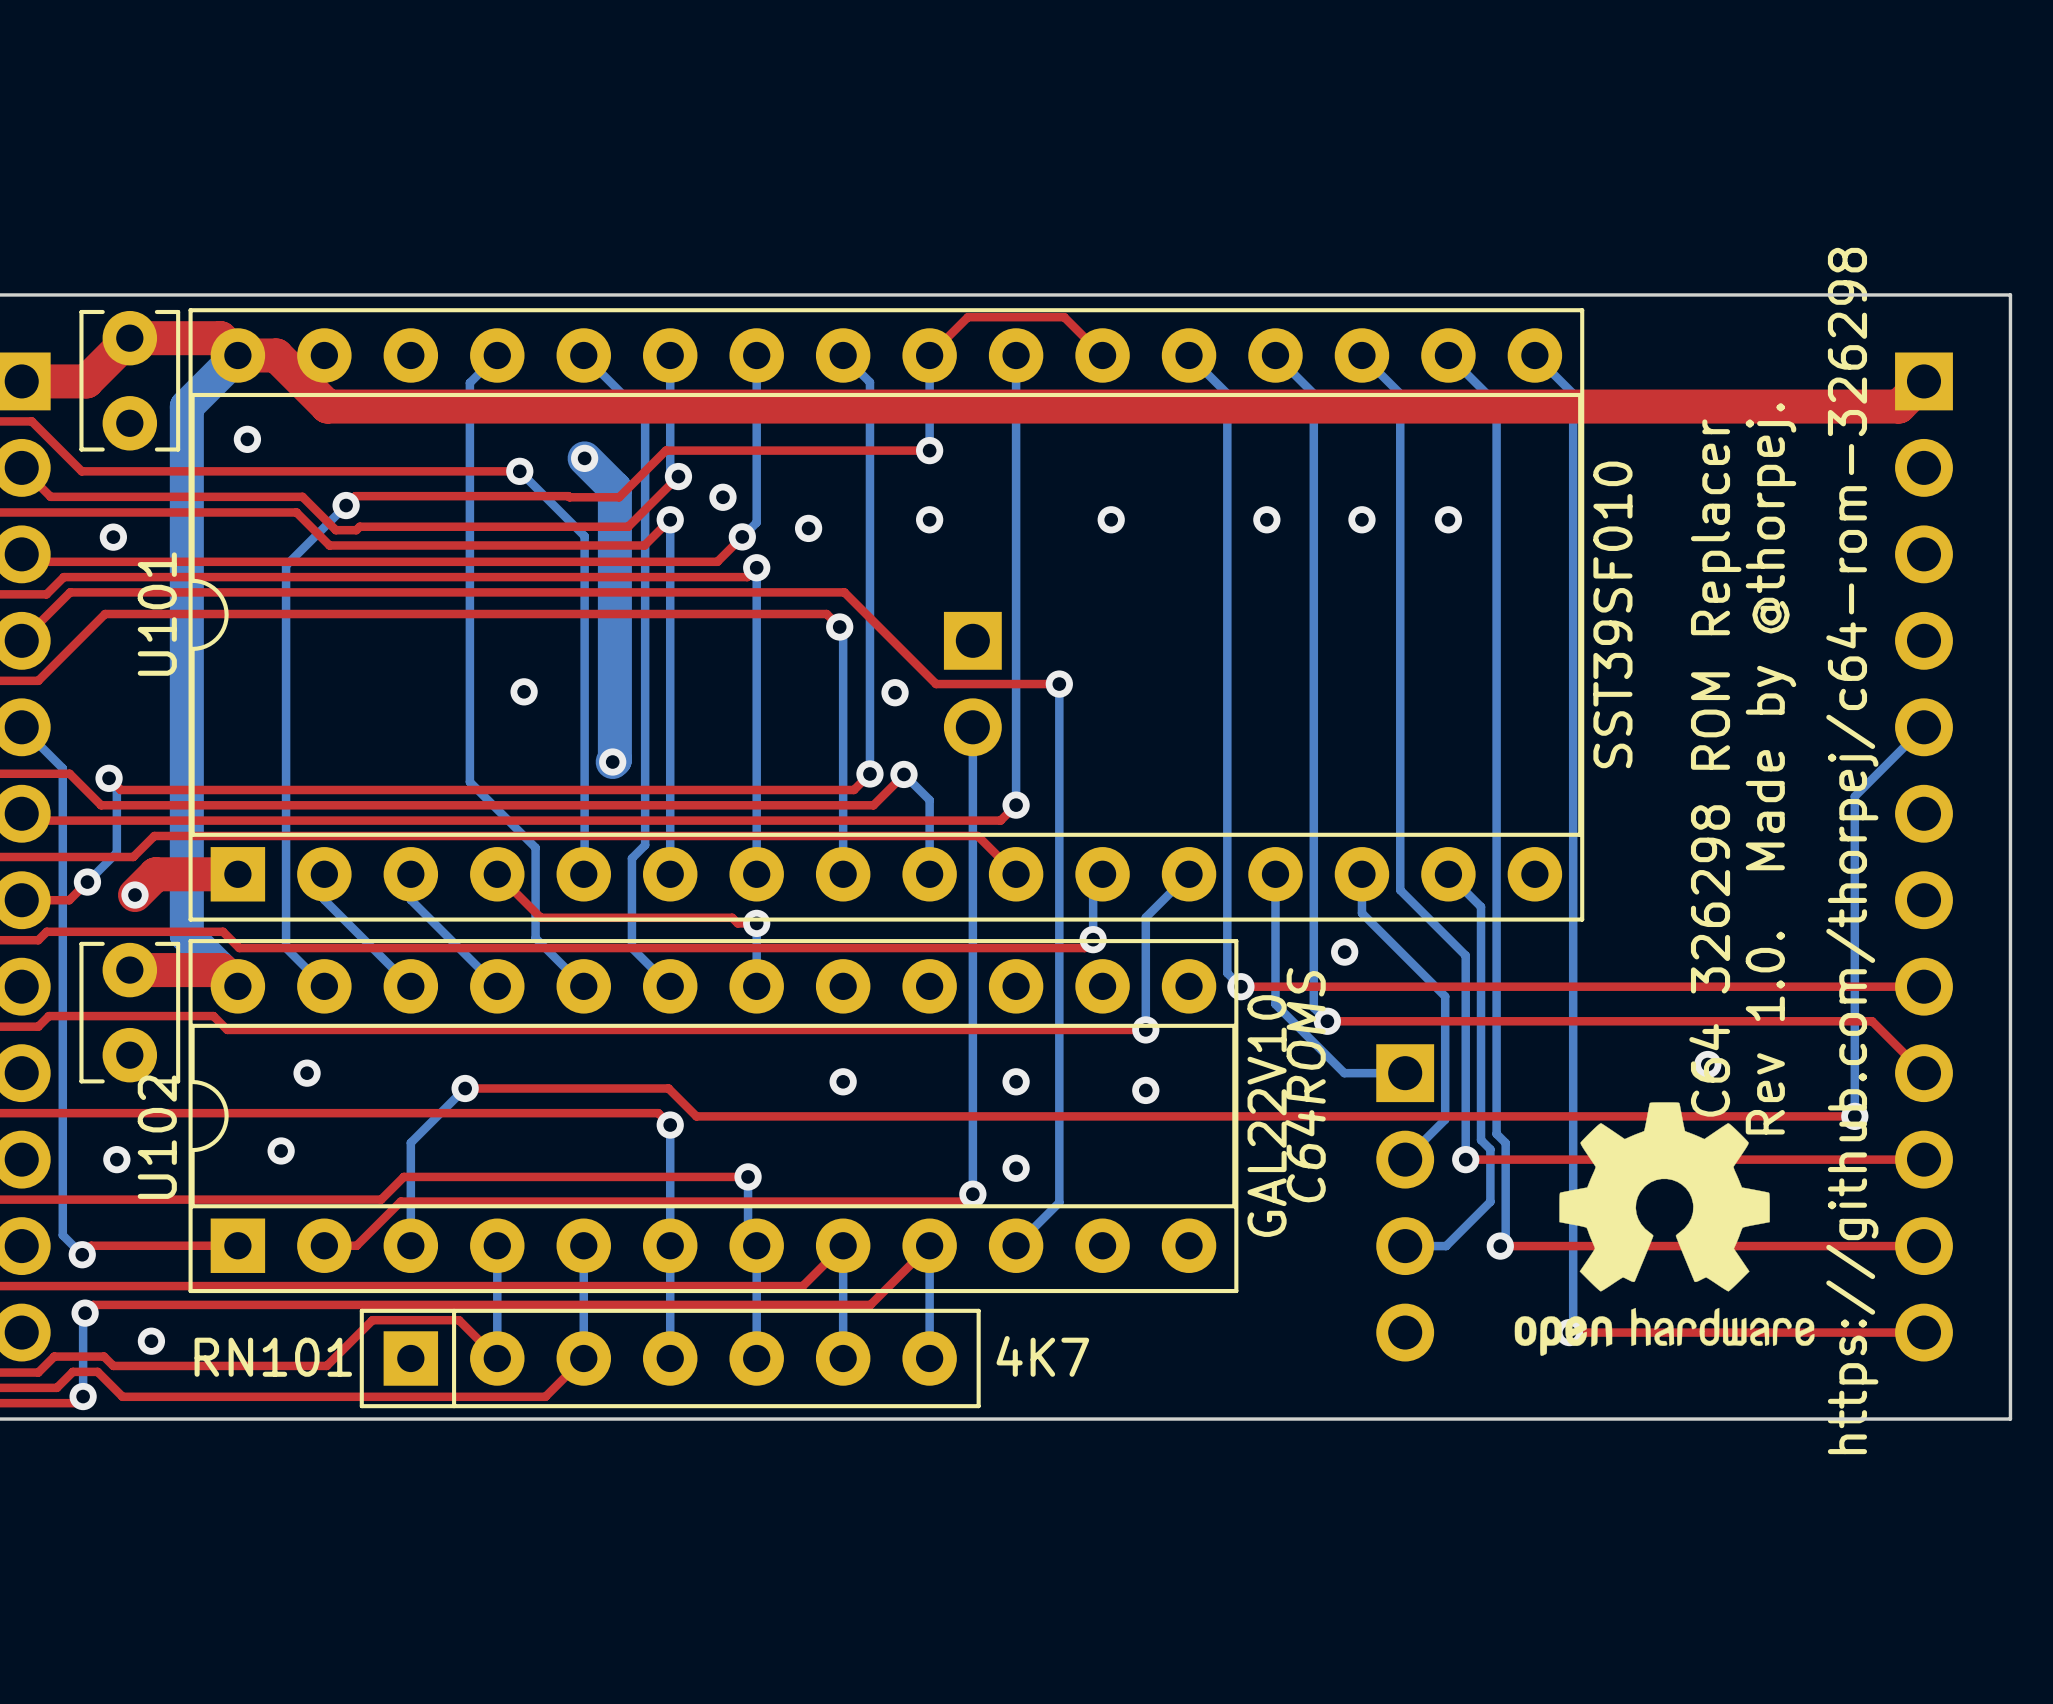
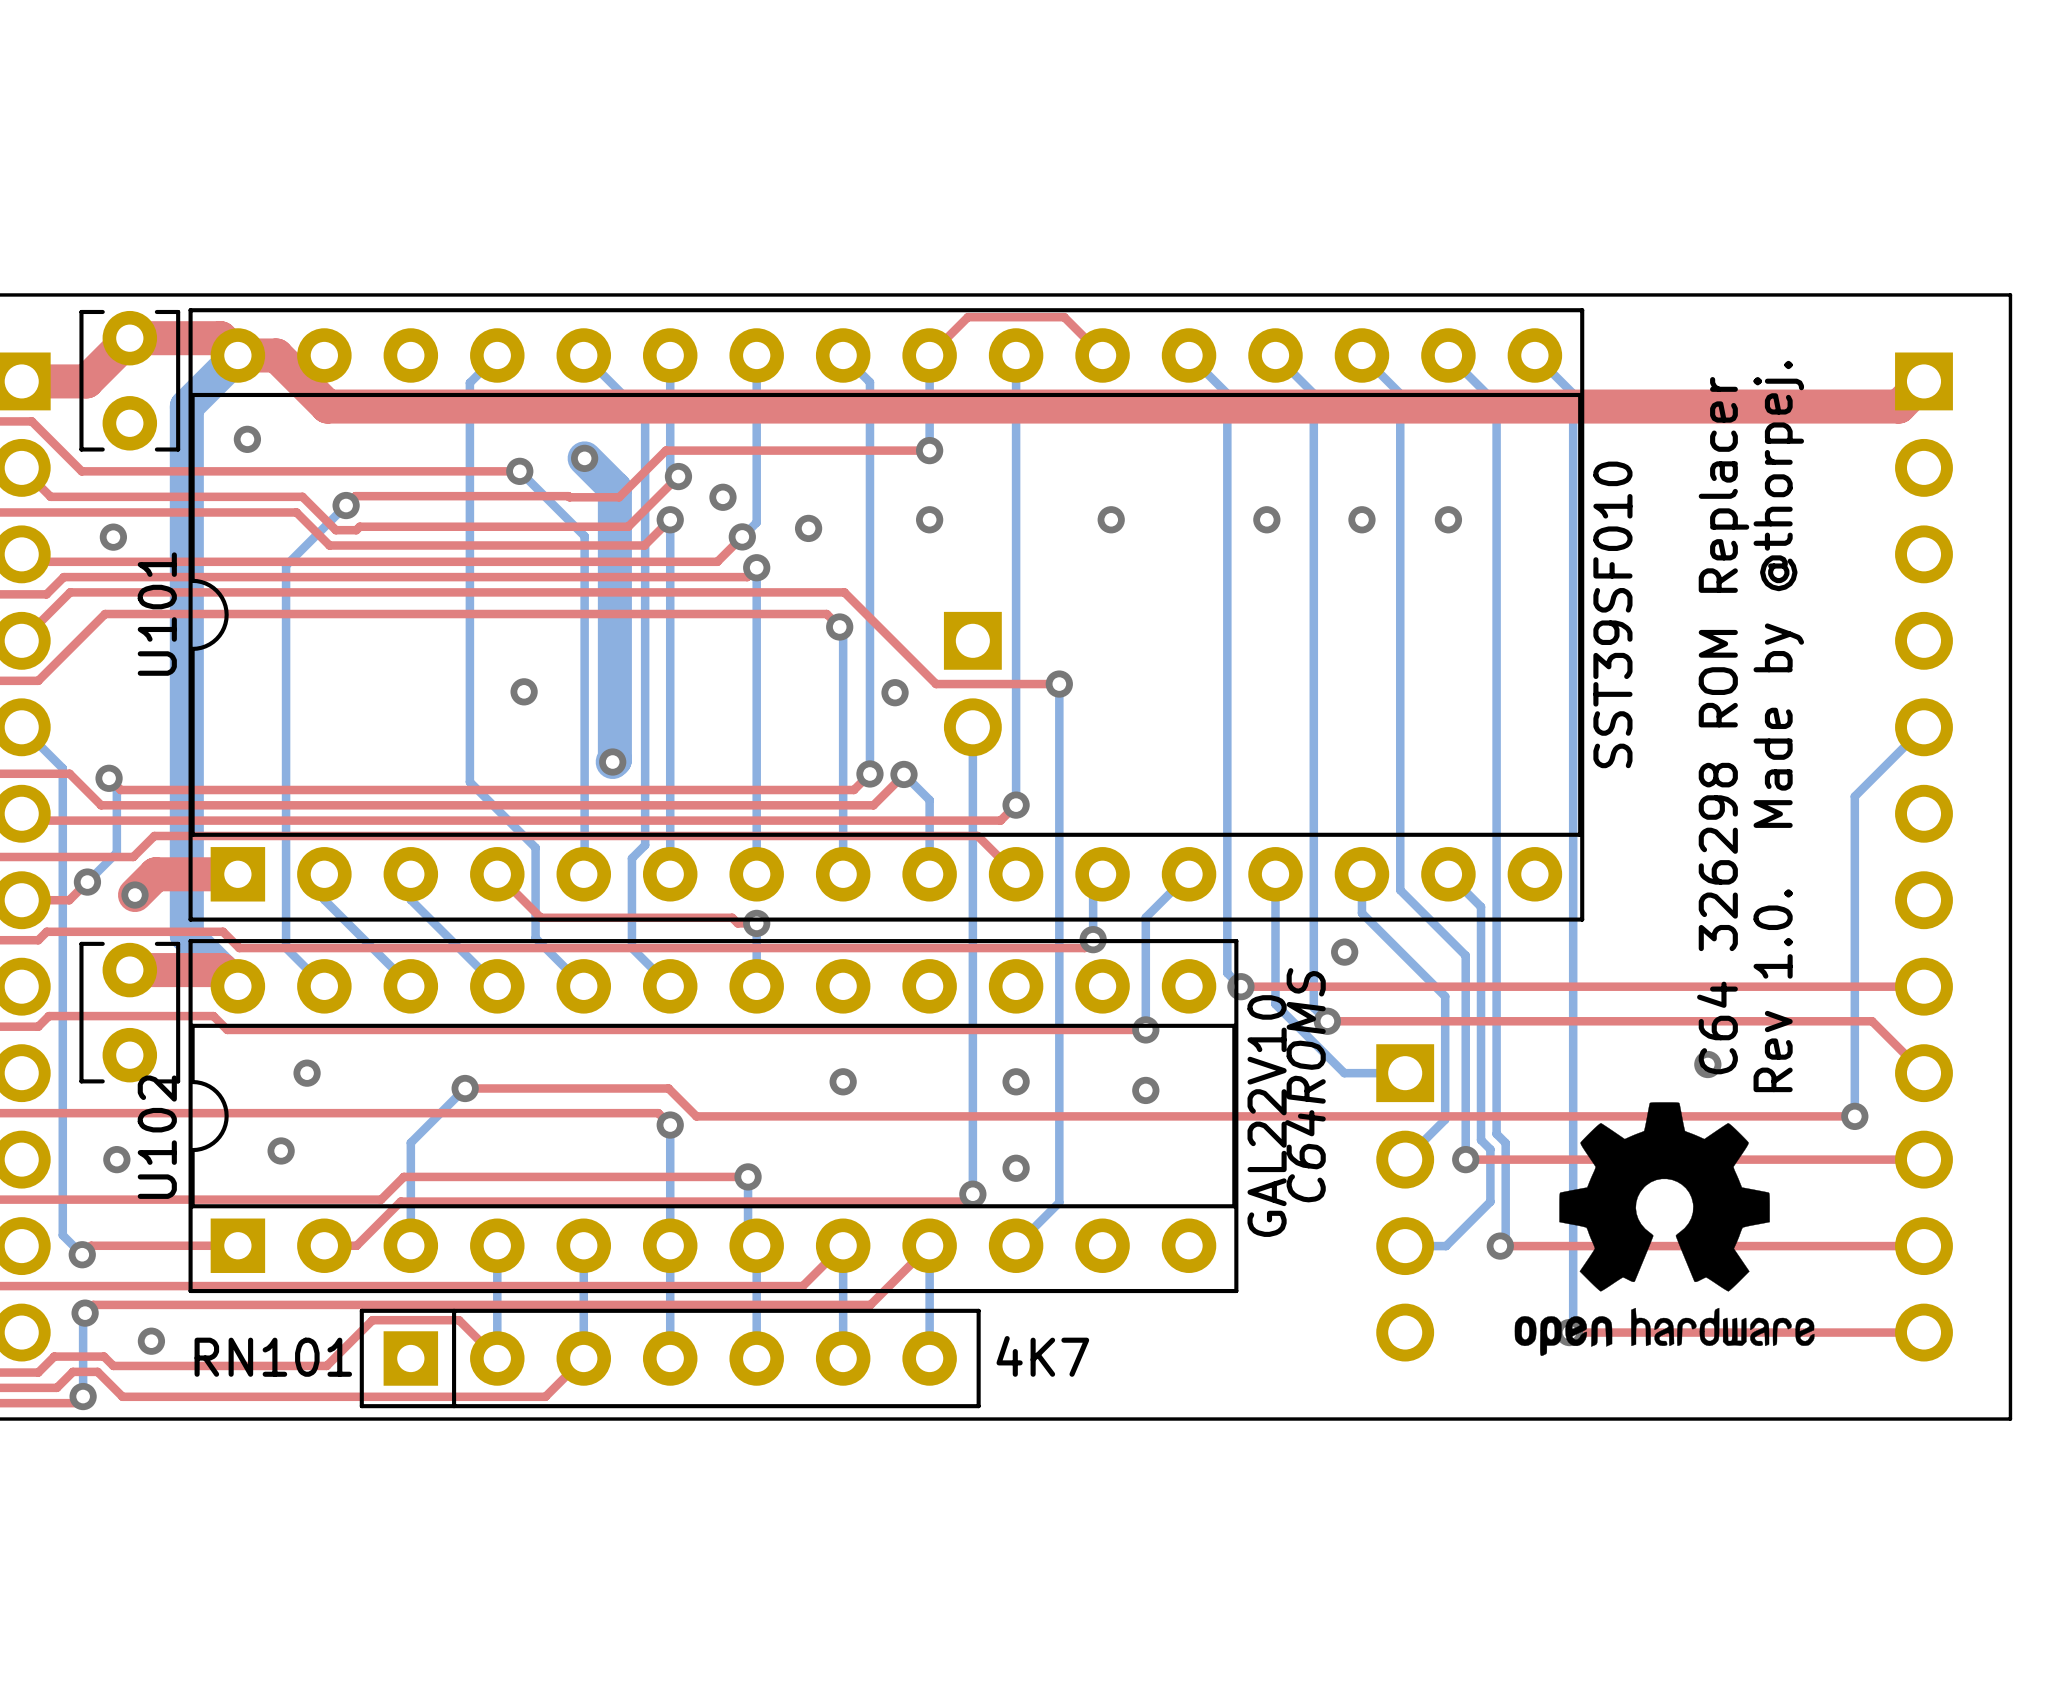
text position: C64 326298 ROM Replacer (1715, 768) -> C64 326298 ROM Replacer (1723, 725)
text position: Rev 1.0. Made by @thorpej. (1771, 768) -> Rev 1.0. Made by @thorpej. (1778, 726)
text: https://github.com/thorpej/c64-rom-326298 (1852, 850) -> none

